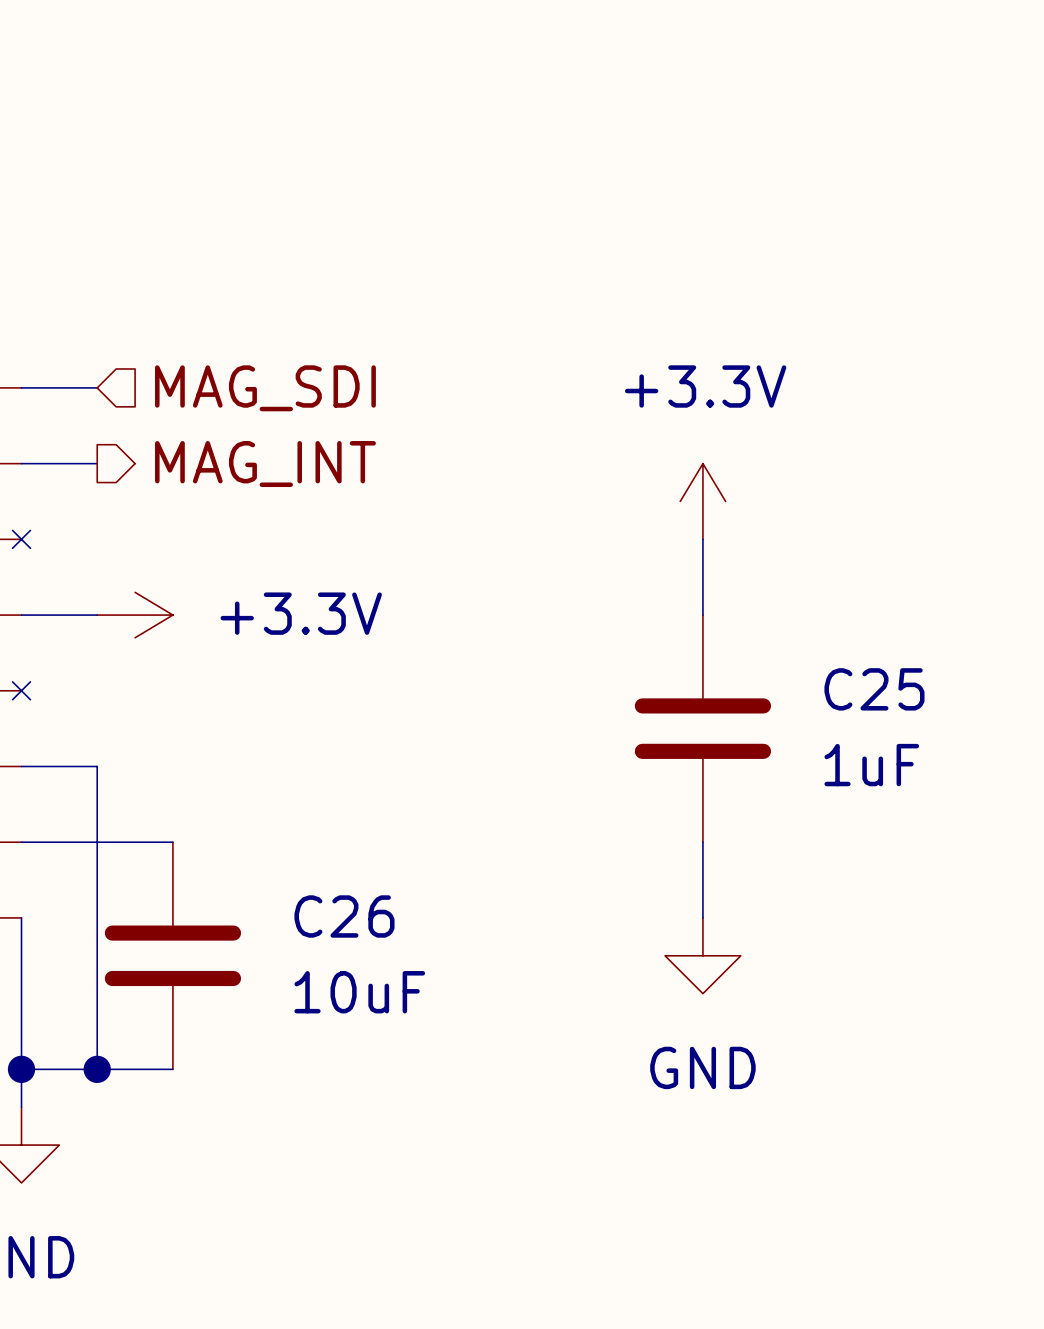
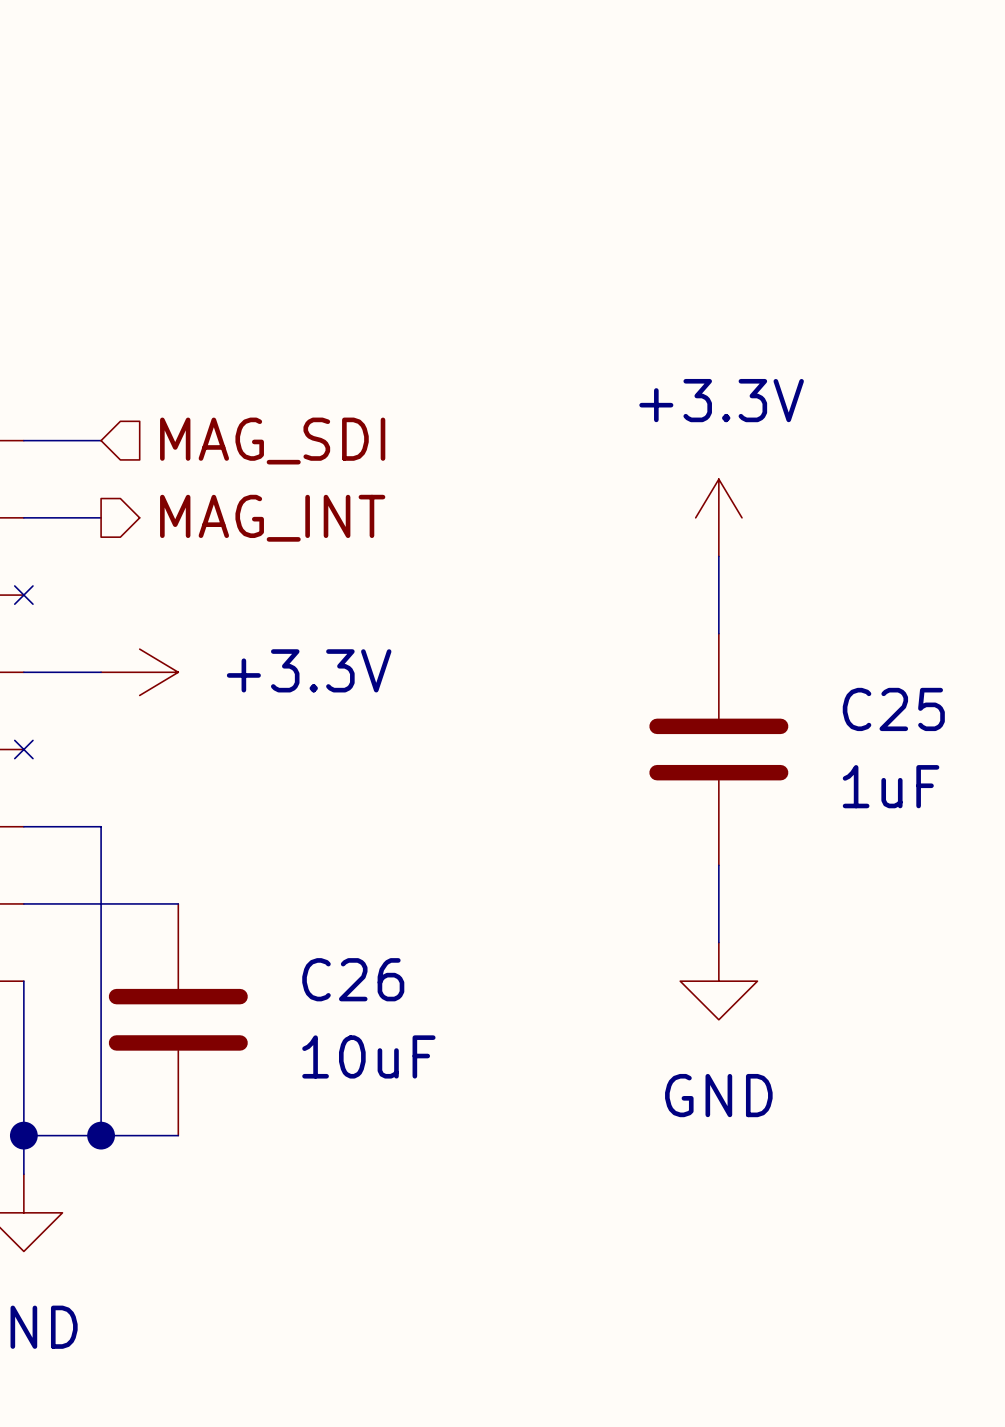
power symbol position: +3.3V (702, 501) -> +3.3V (718, 517)
C25 position: (702, 728) -> (718, 749)
power symbol position: GND (702, 955) -> GND (718, 981)

